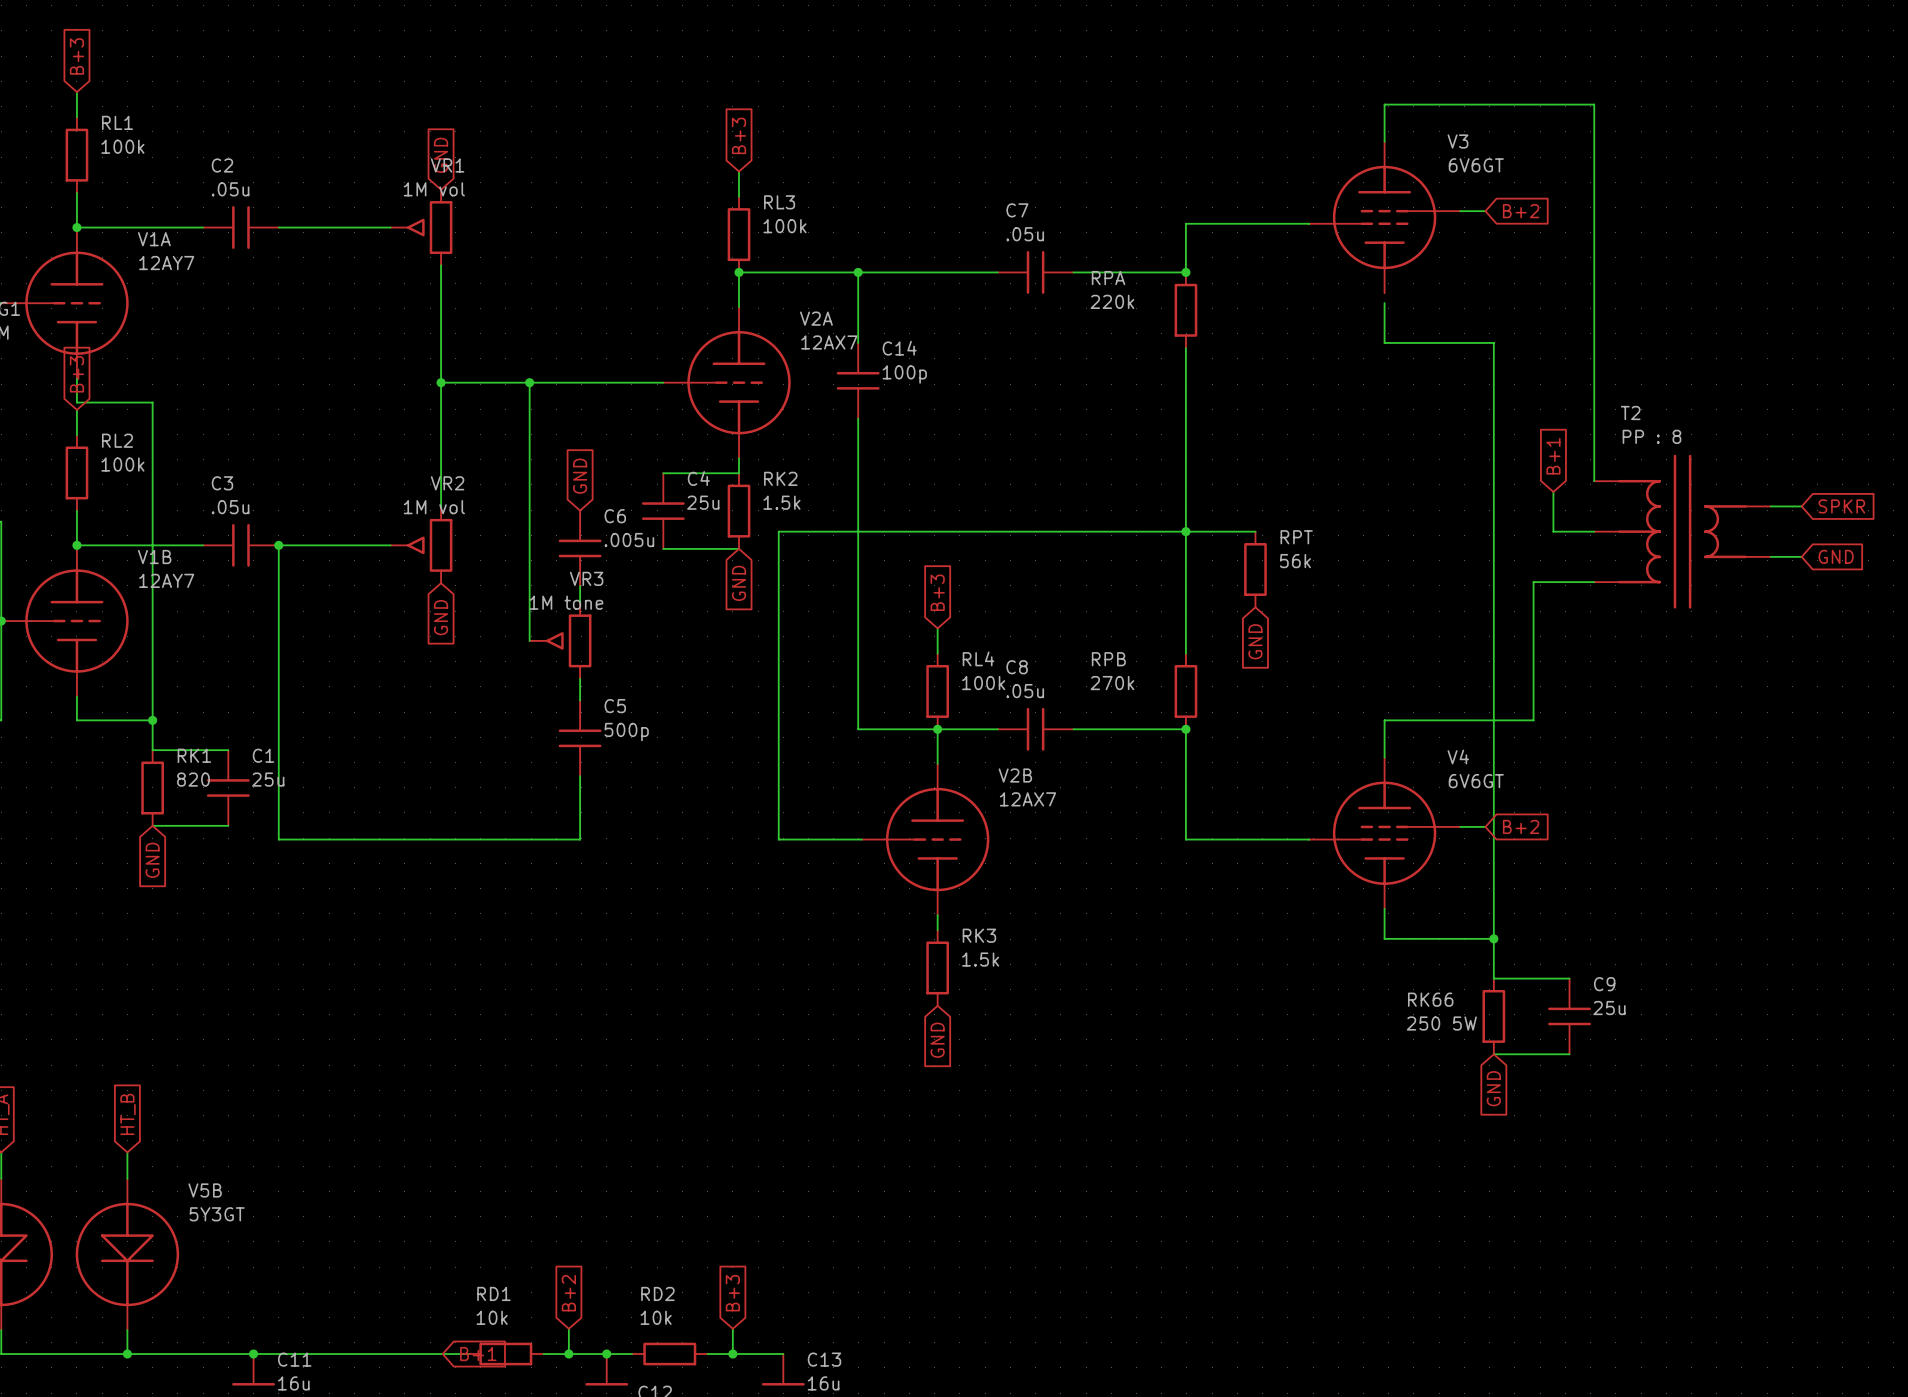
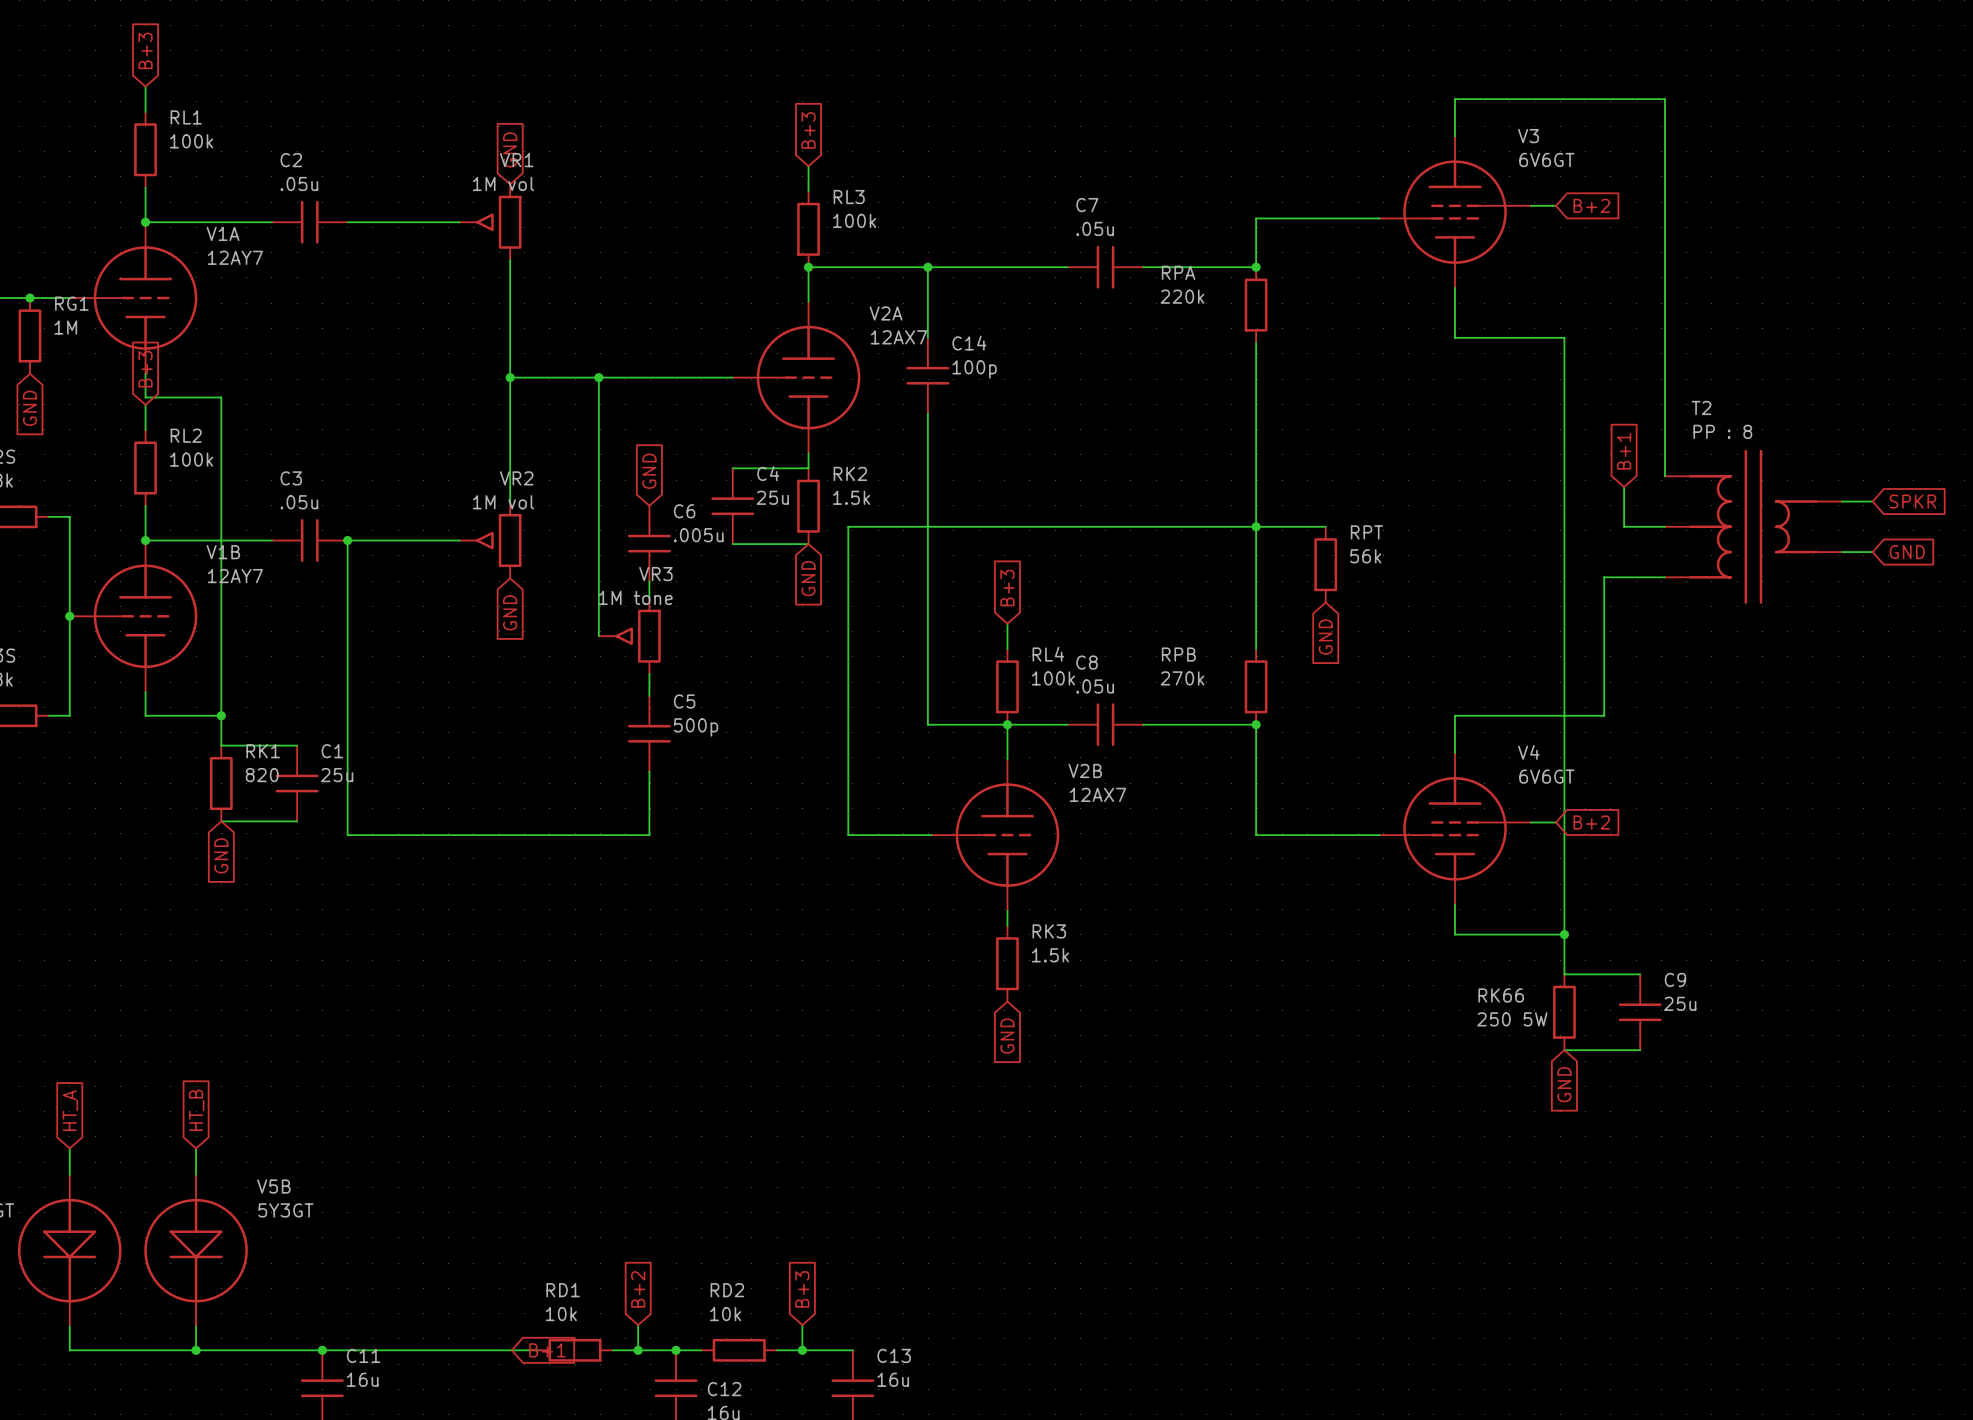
wire: none -> (1455, 287) (1455, 297)

